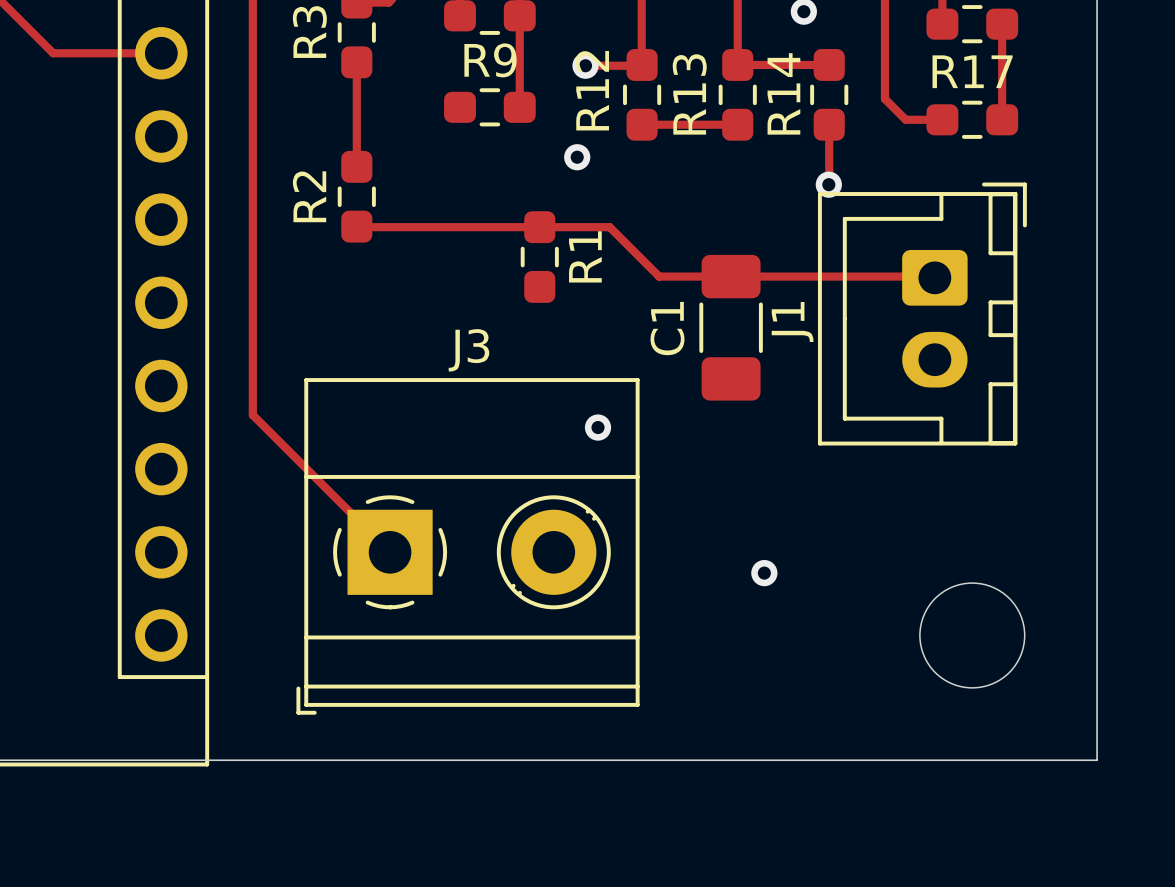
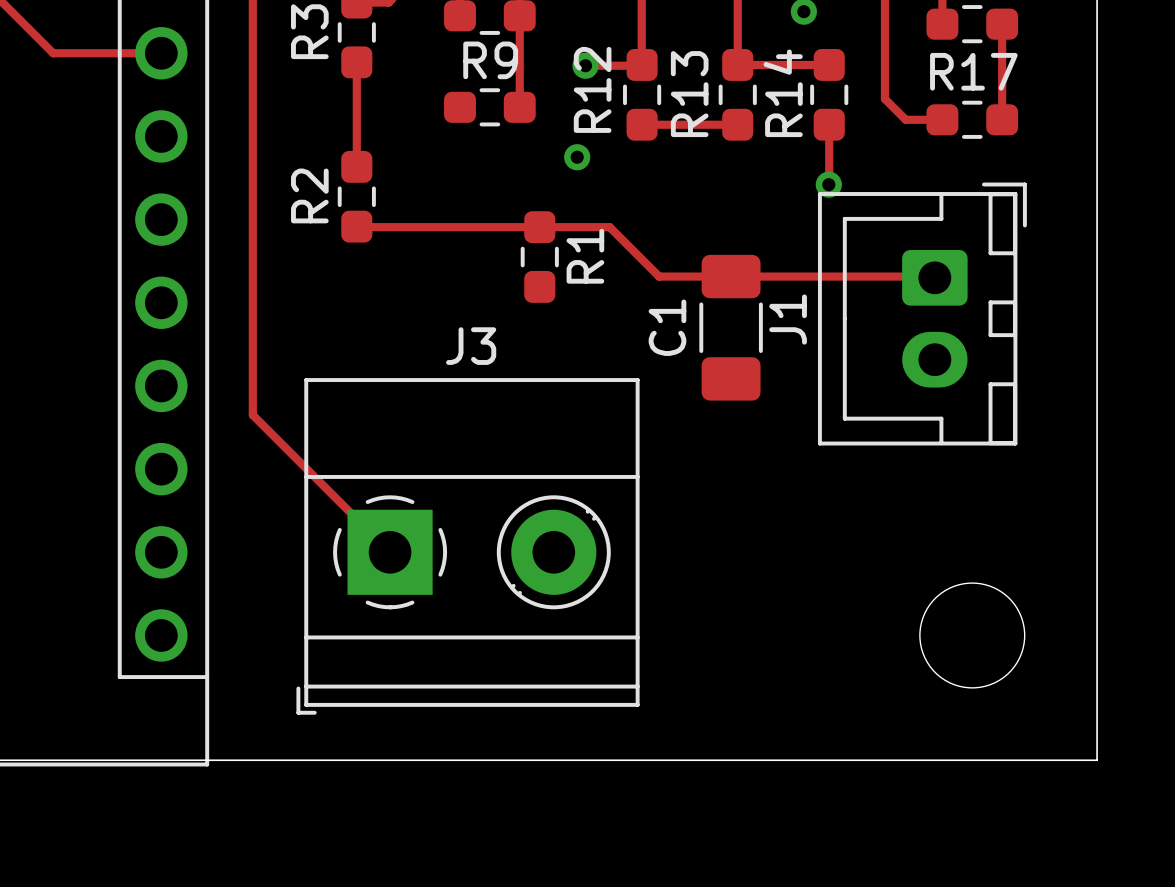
via: (598, 427) -> none
via: (764, 573) -> none

